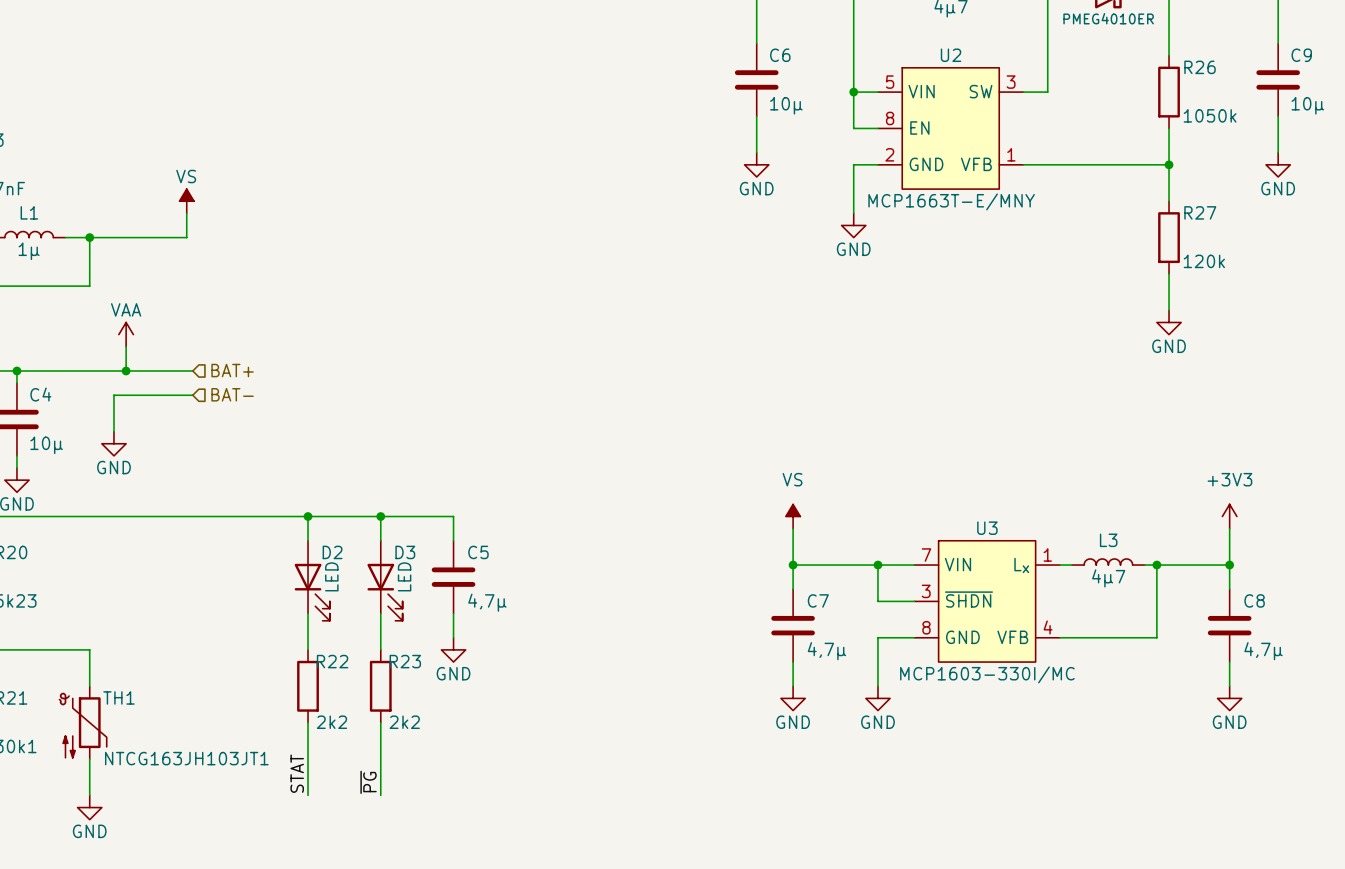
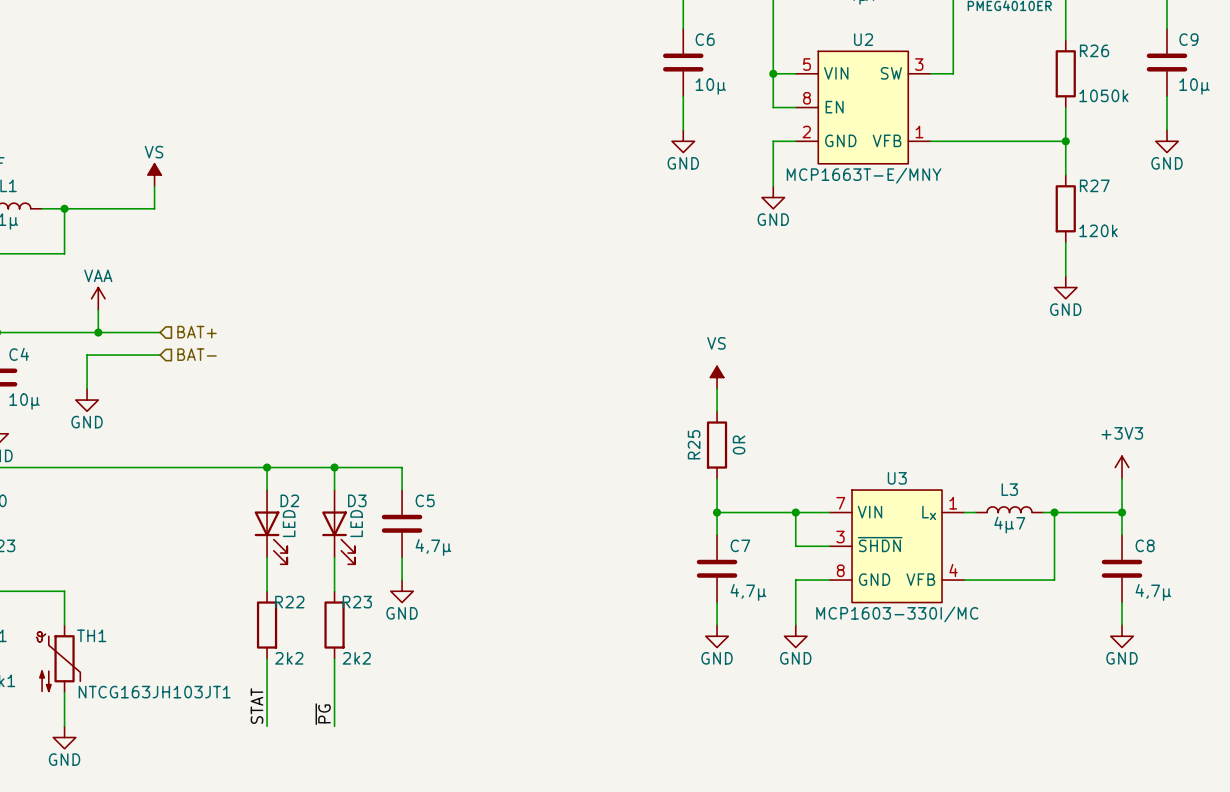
wire: none -> (717, 388) (717, 411)
R25: none -> 0R (717, 445)
power symbol position: VS (793, 516) -> VS (717, 377)

